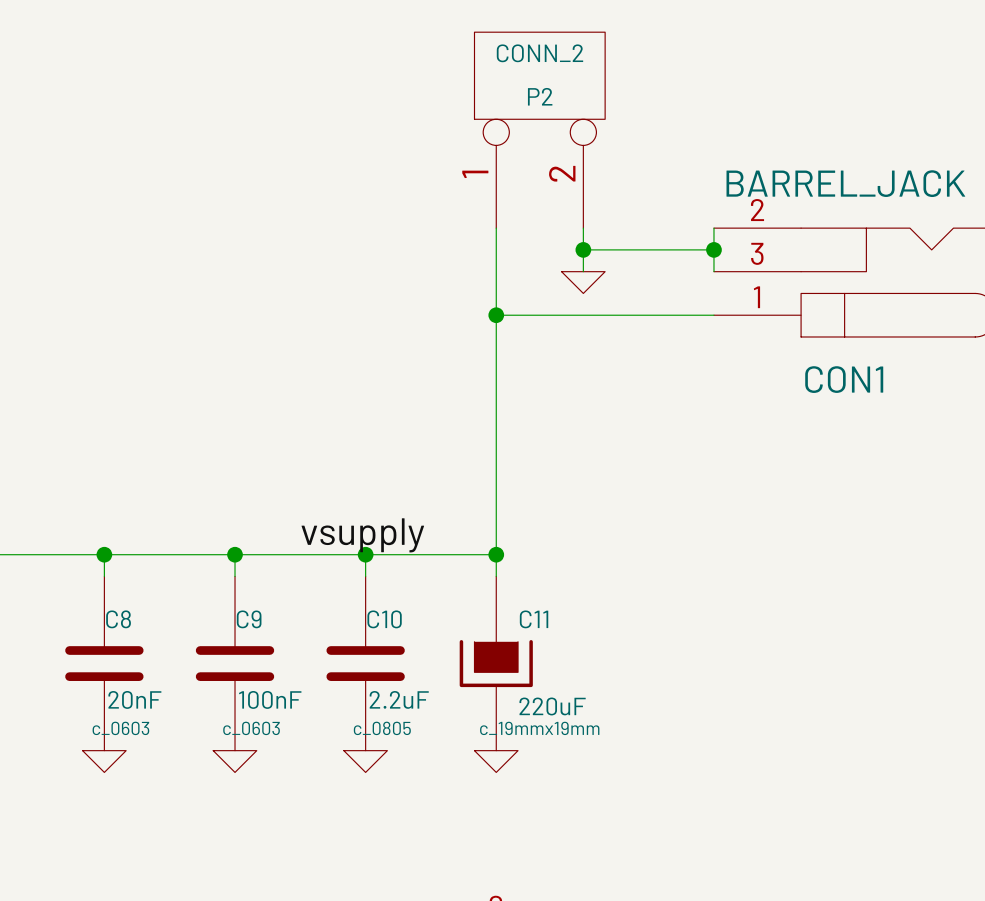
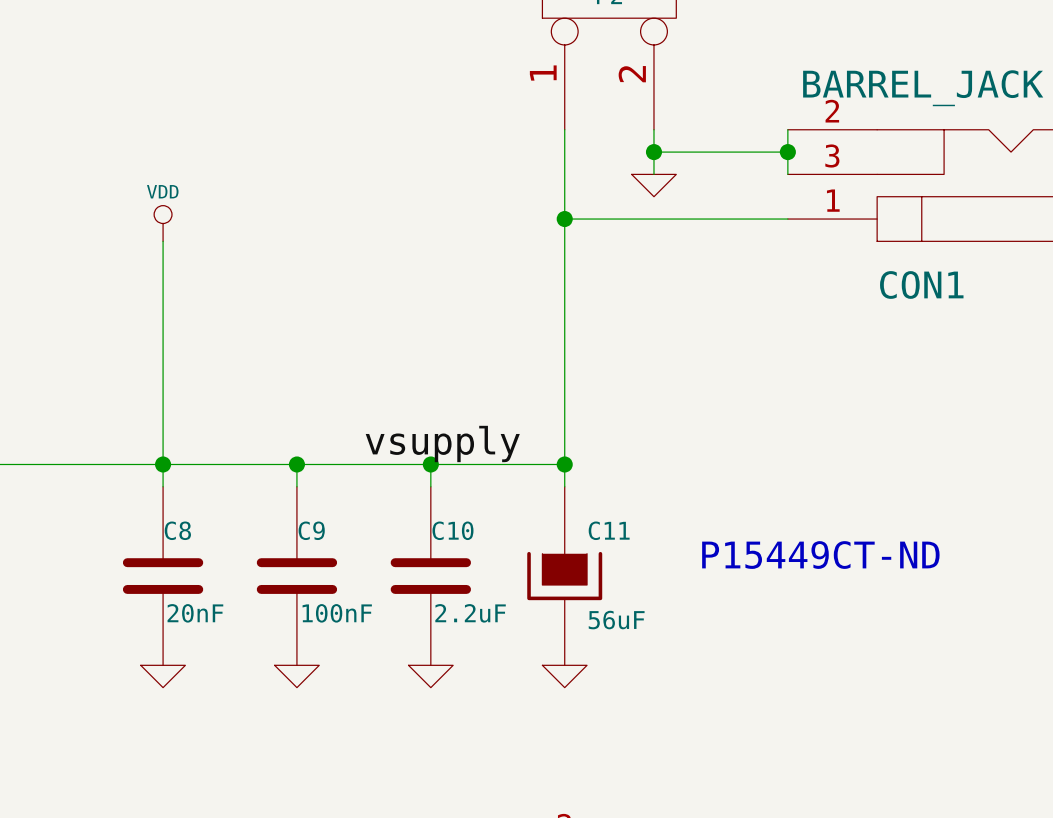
power symbol: none -> VDD (163, 223)
wire: none -> (163, 241) (163, 464)
text: none -> P15449CT-ND (820, 555)
C11 value: 220uF (552, 706) -> 56uF (616, 620)
C8 text: c_0603 (120, 728) -> none
C9 text: c_0603 (251, 728) -> none
C10 text: c_0805 (382, 728) -> none
C11 text: c_19mmx19mm (539, 728) -> none

